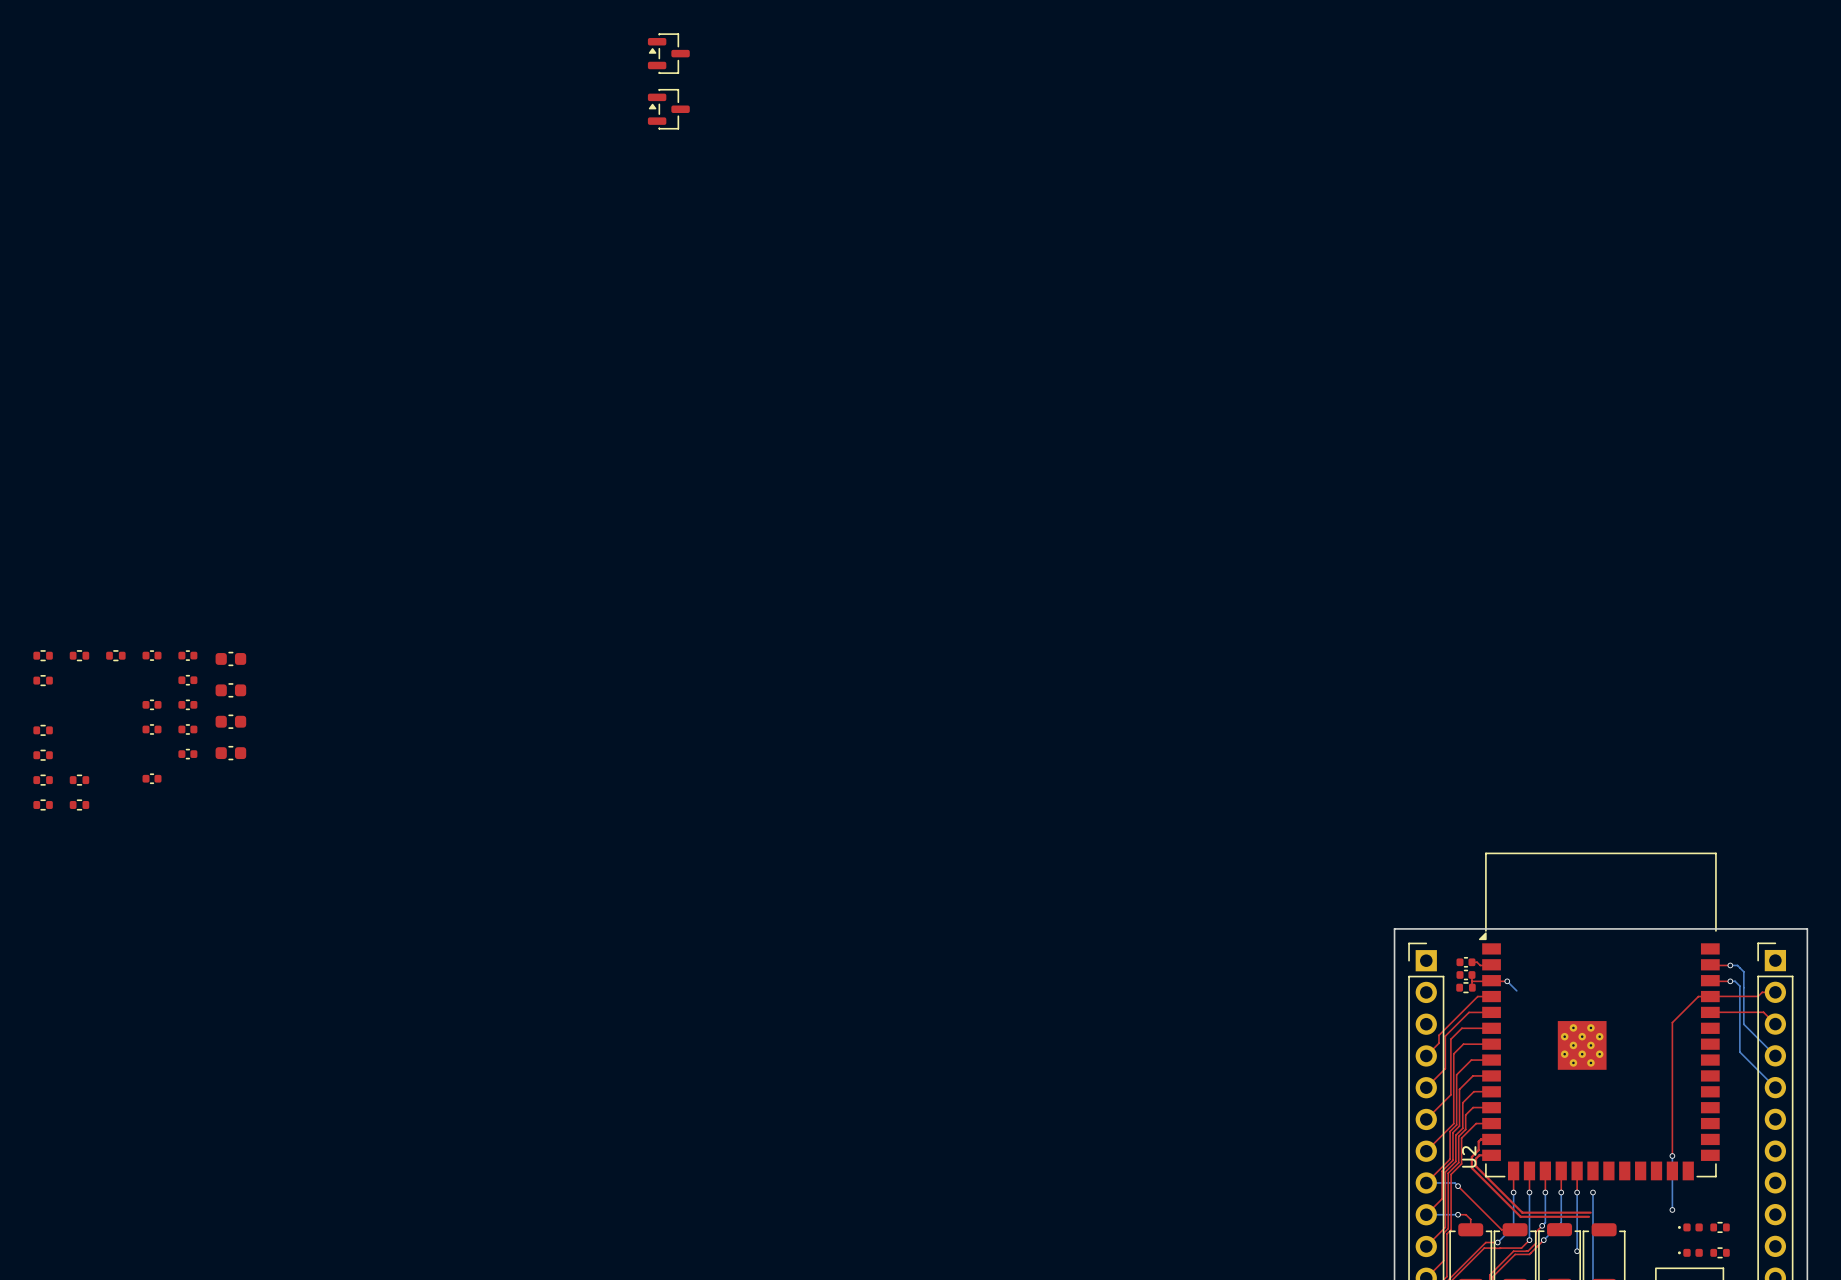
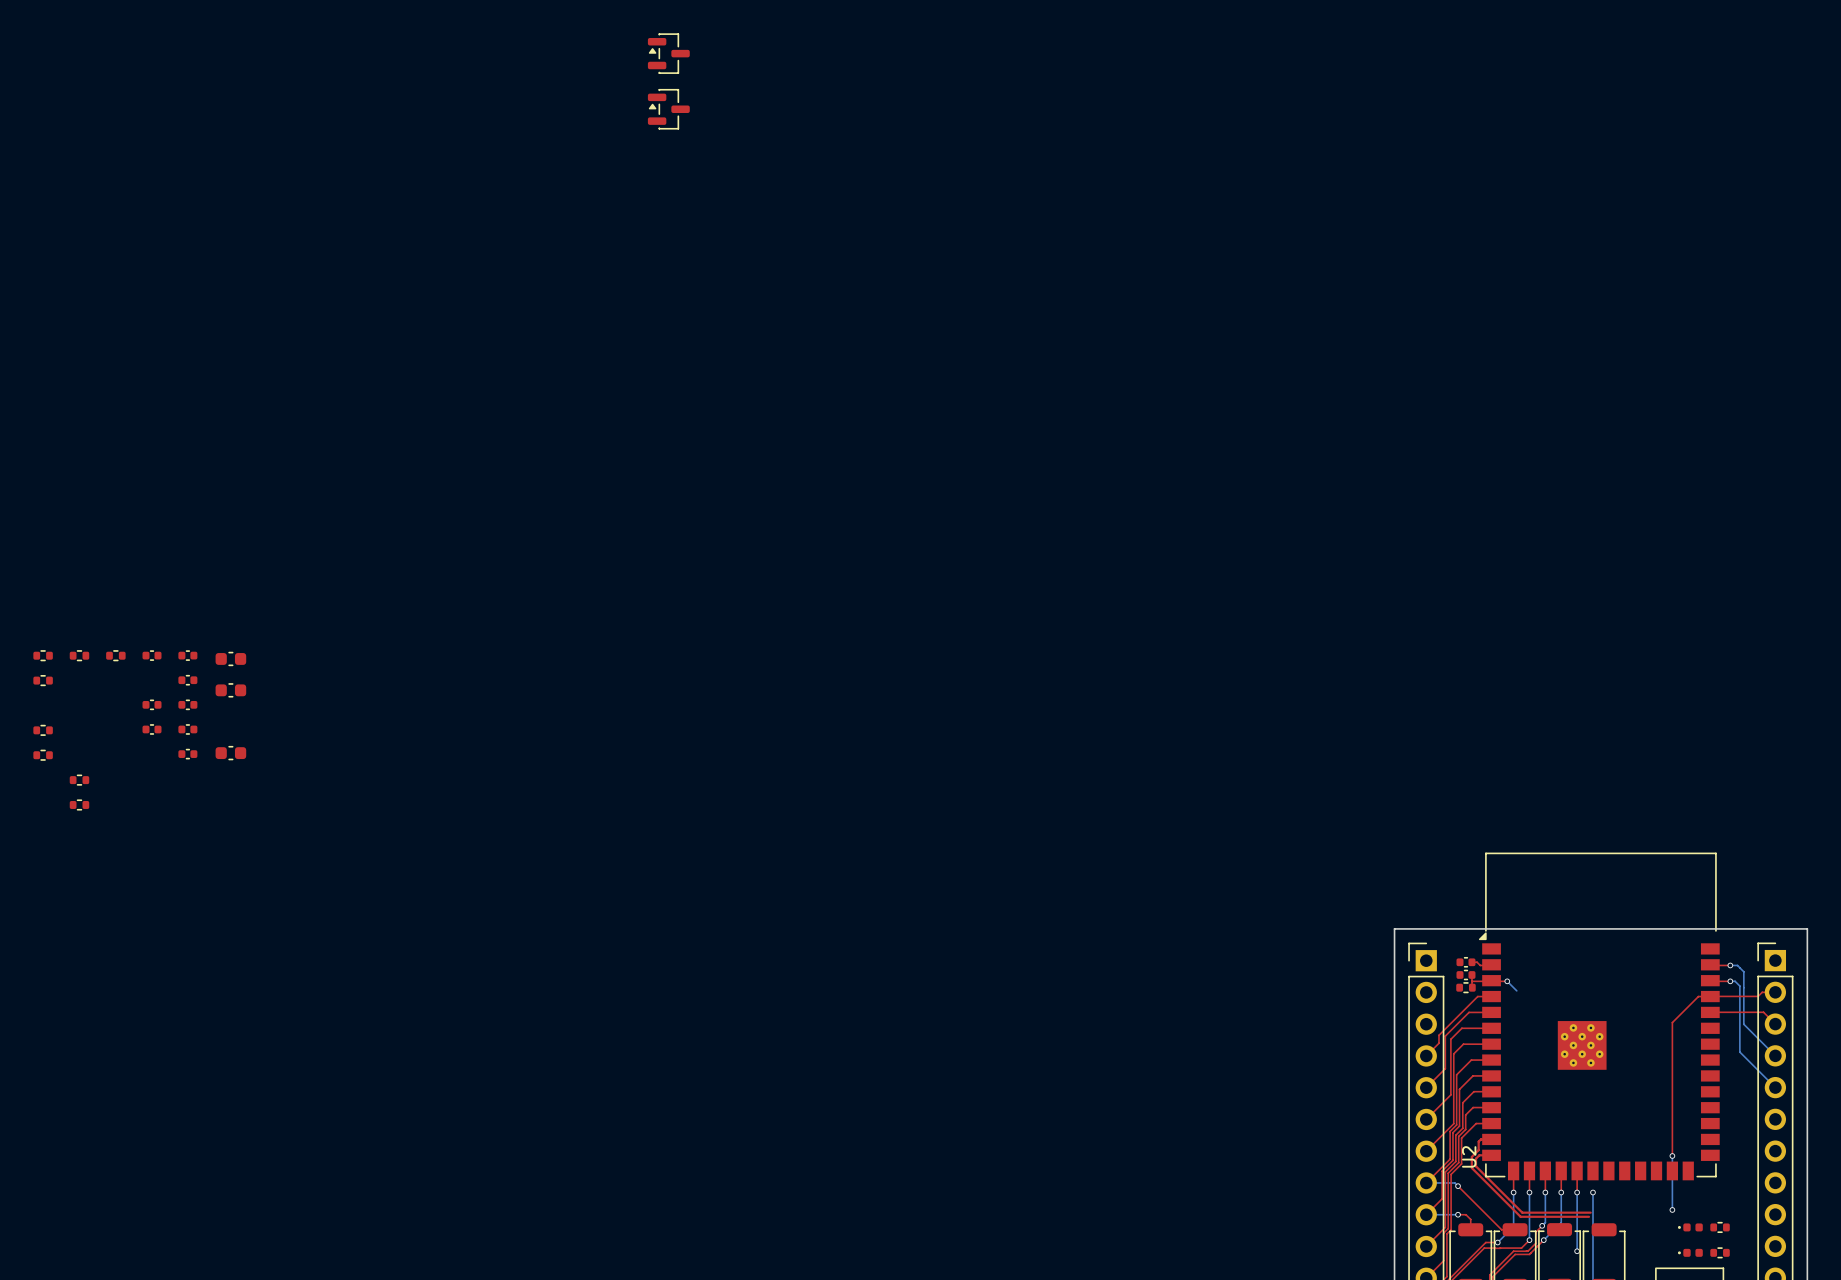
part: (230, 721) -> none
part: (152, 778) -> none
part: (43, 780) -> none
part: (43, 804) -> none

